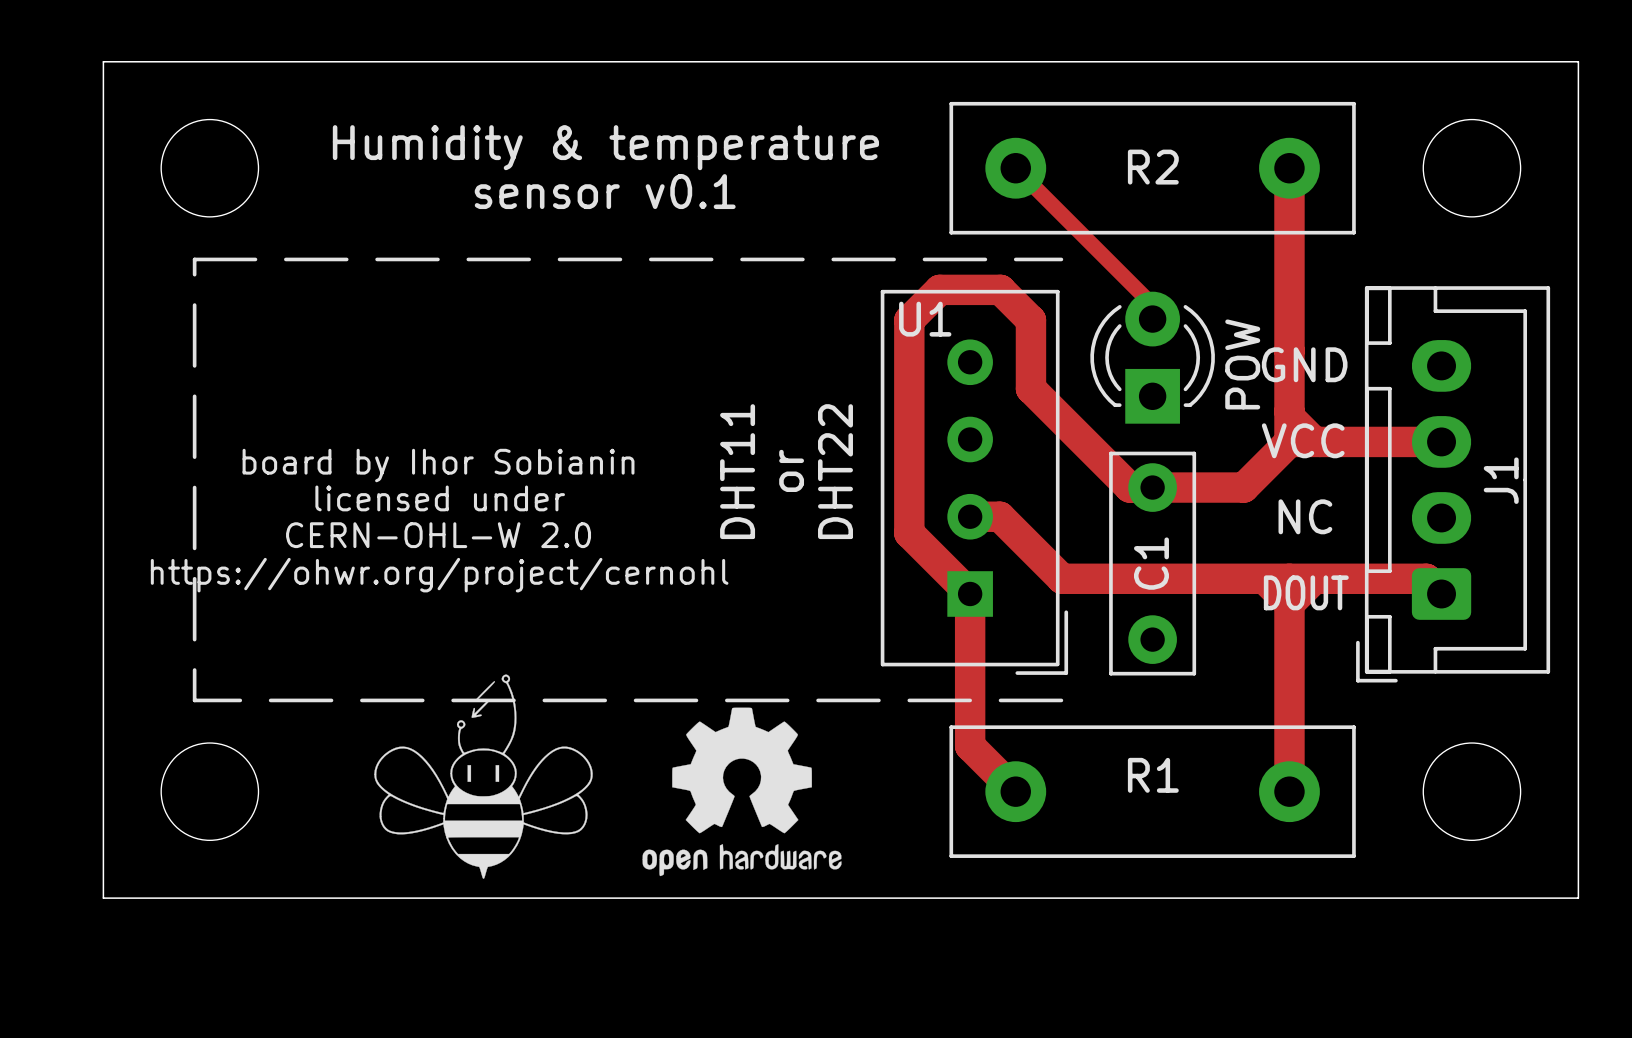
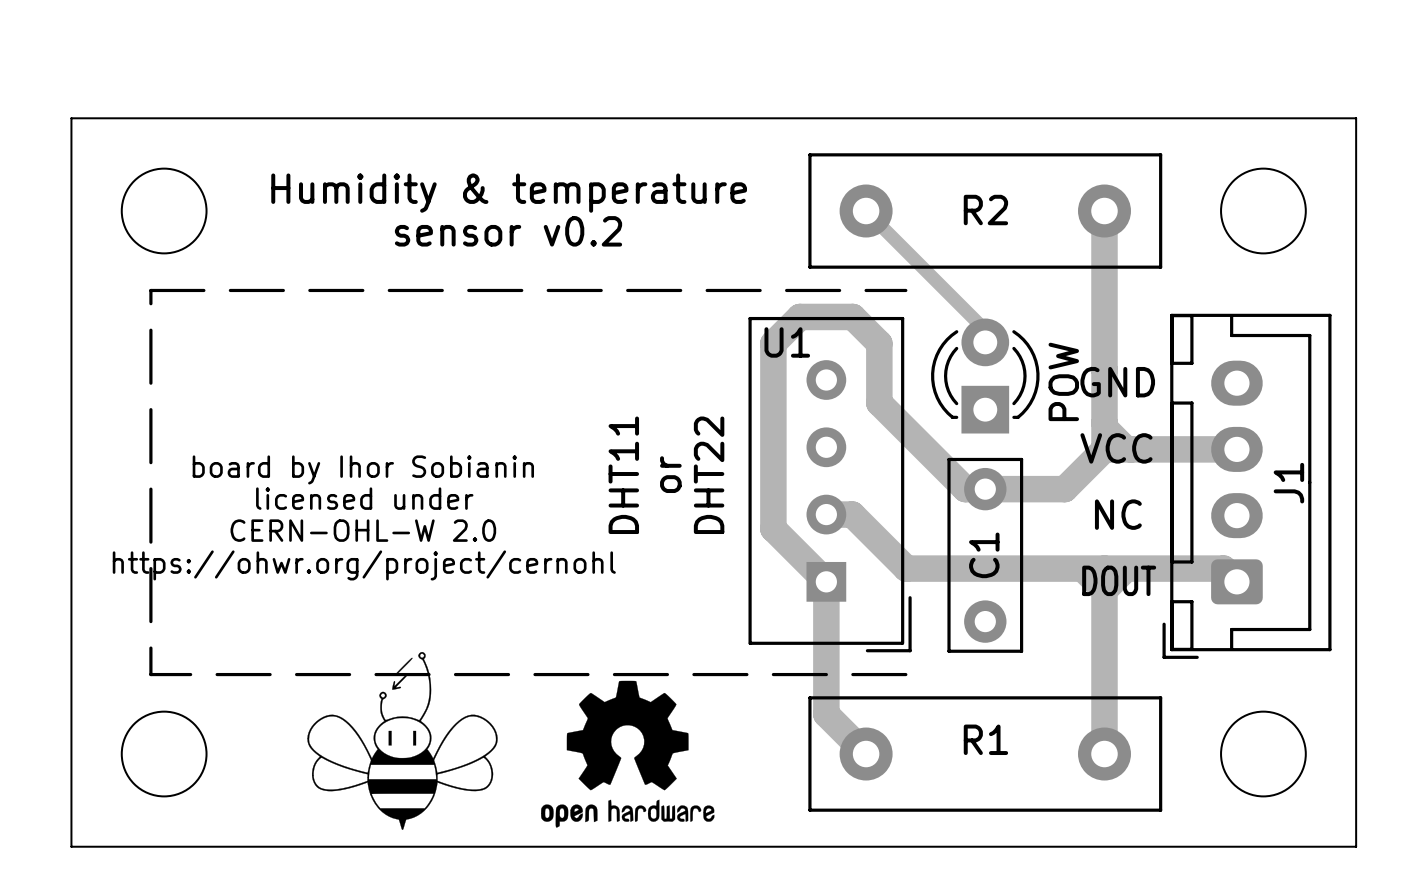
text: sensor v0.1 (605, 191) -> sensor v0.2 (508, 231)

